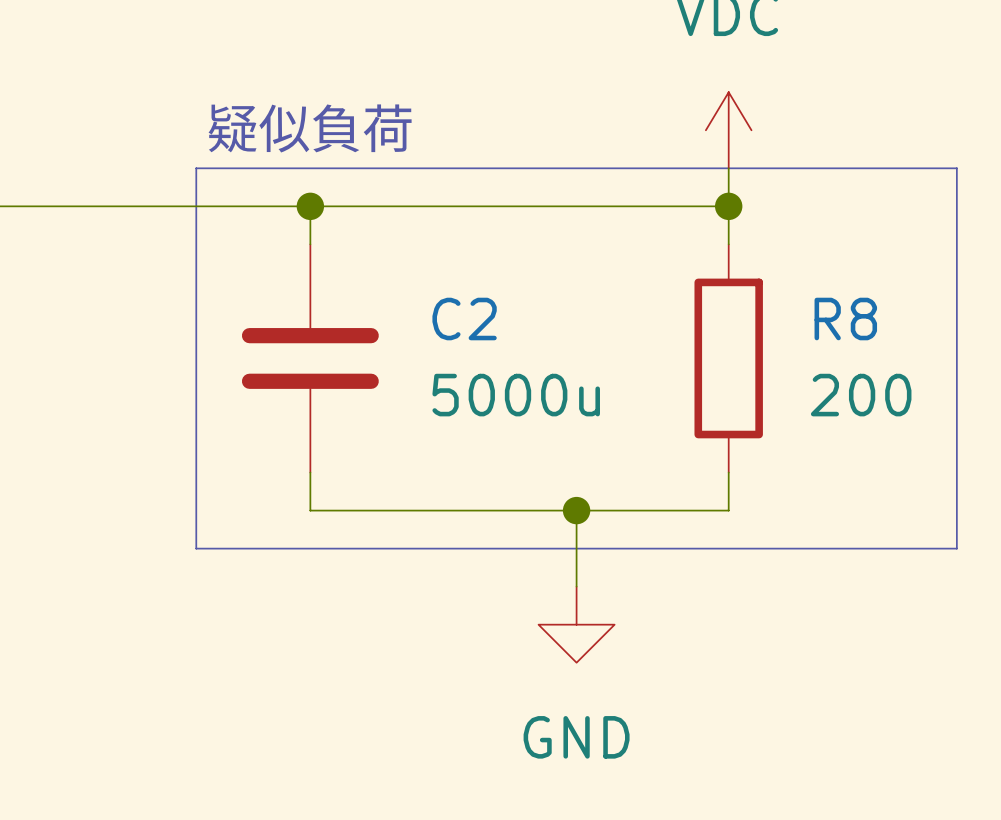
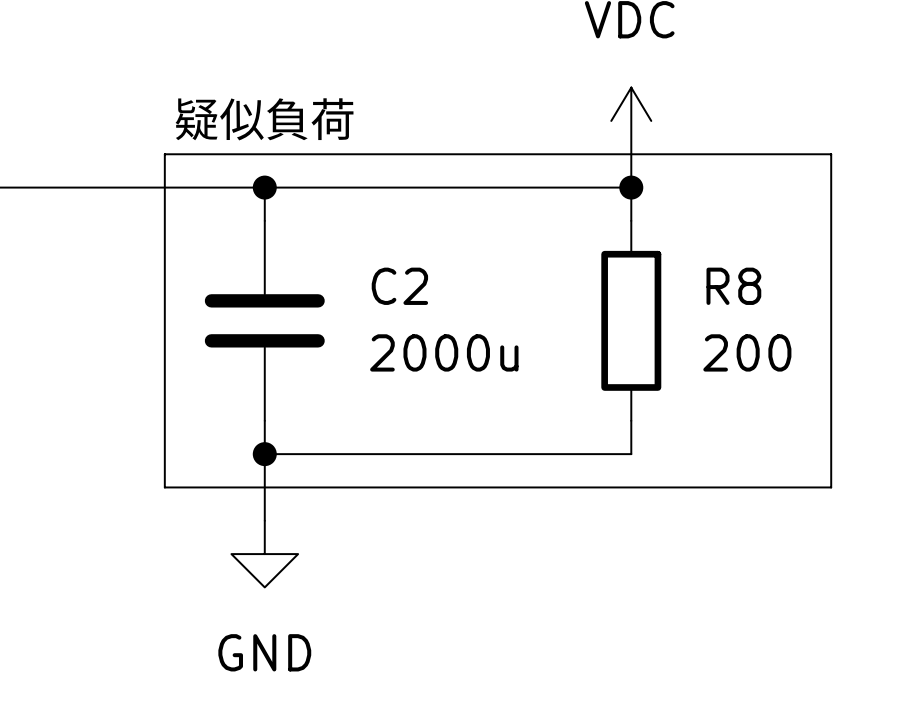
C2 value: 5000u (516, 395) -> 2000u (444, 352)
junction: none -> (264, 454)
wire: (576, 510) (576, 586) -> (264, 454) (264, 520)
junction: (576, 510) -> none
power symbol position: GND (576, 624) -> GND (264, 554)

